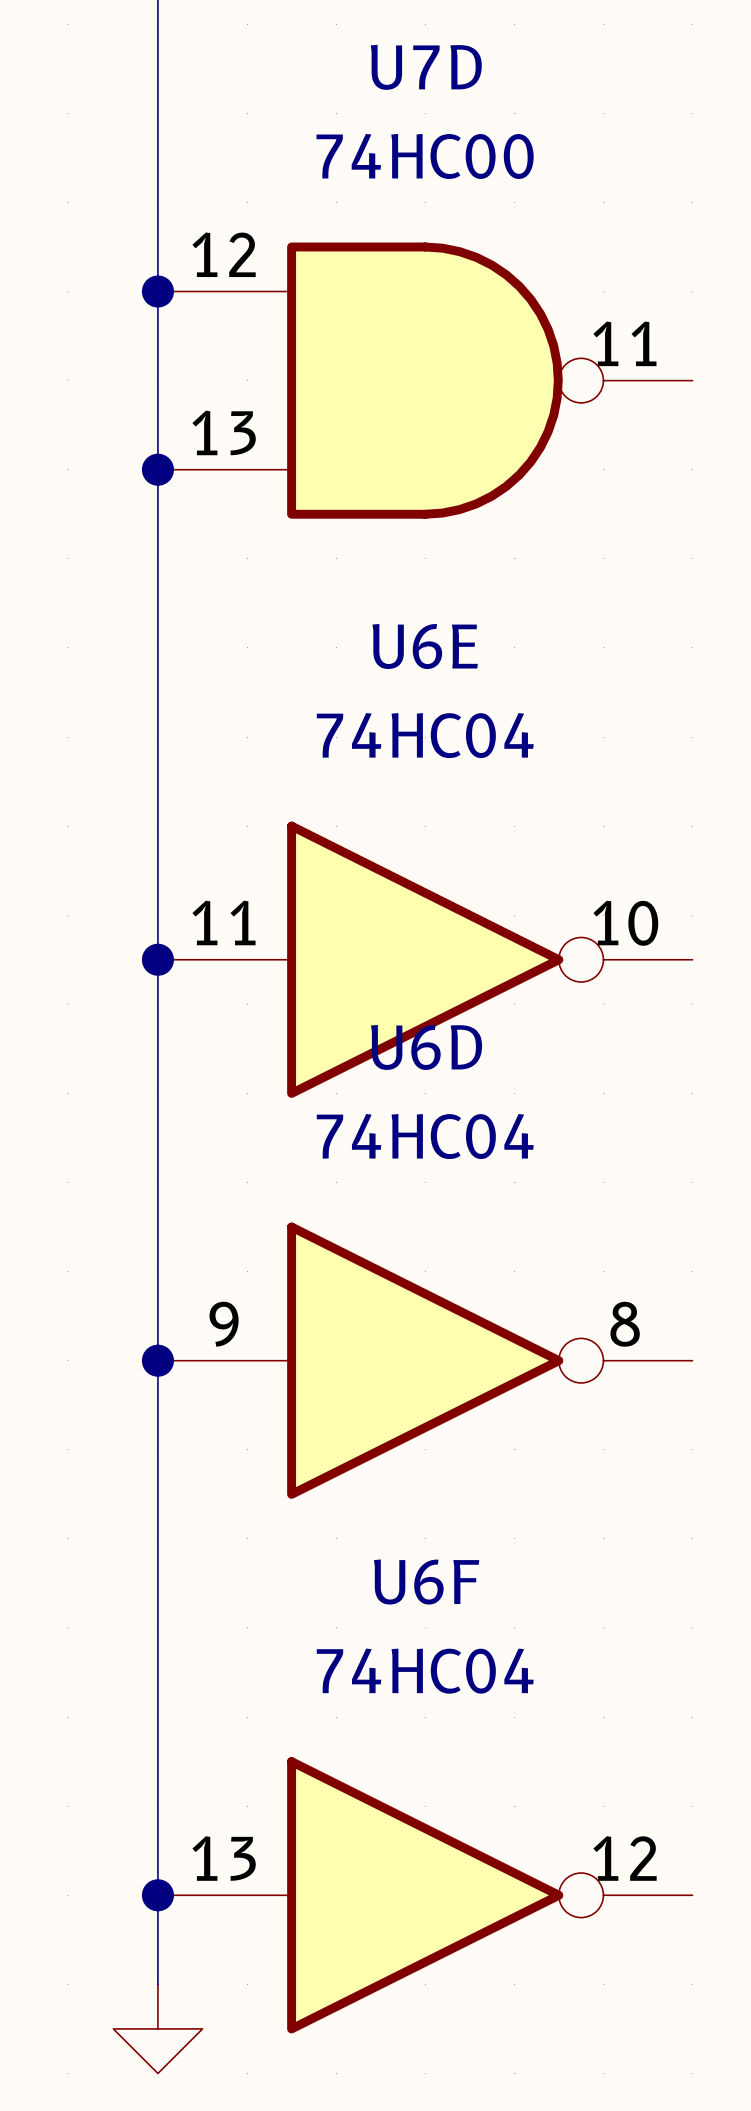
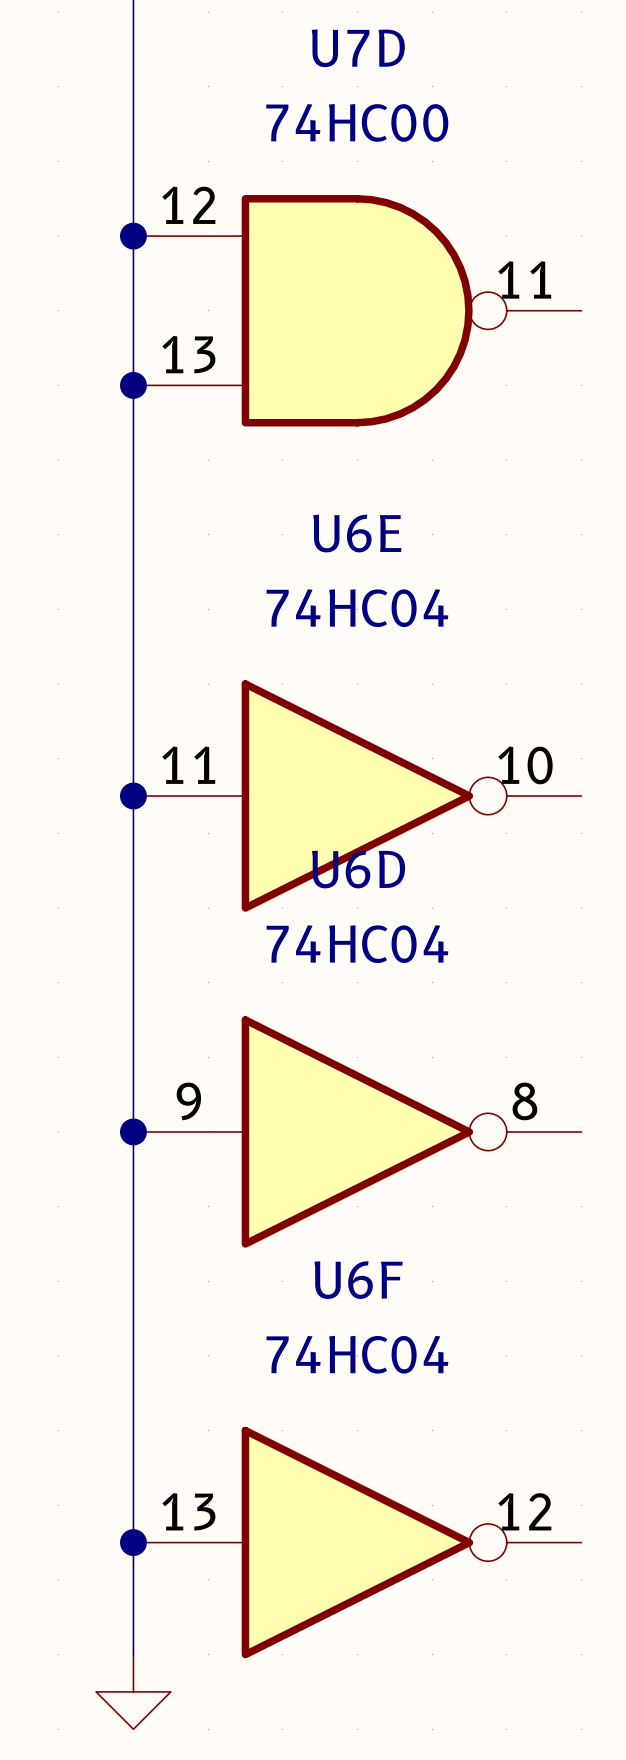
junction position: (157, 1895) -> (133, 1542)
U6F position: (425, 1895) -> (357, 1542)

